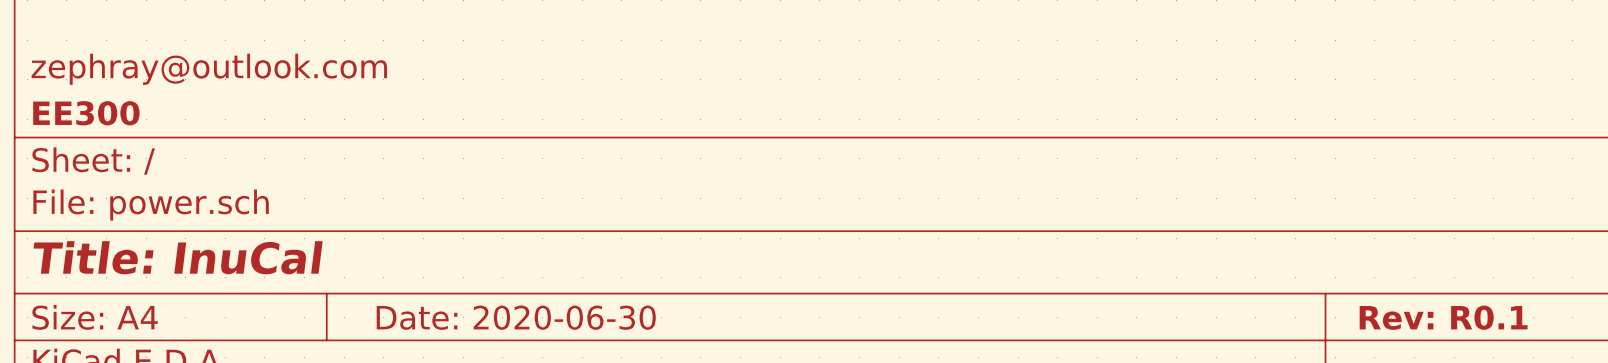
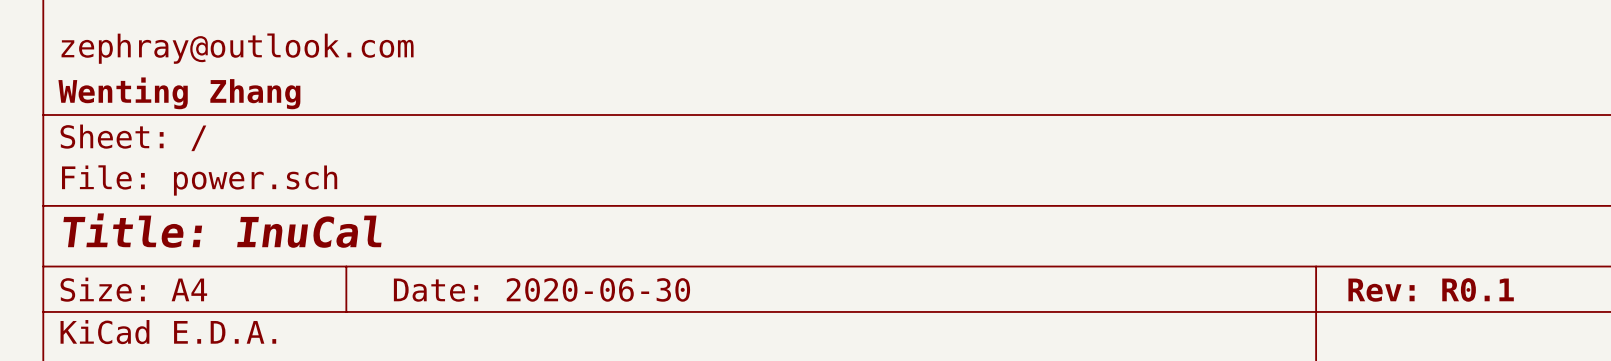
title block: EE300 (86, 113) -> Wenting Zhang (179, 93)

